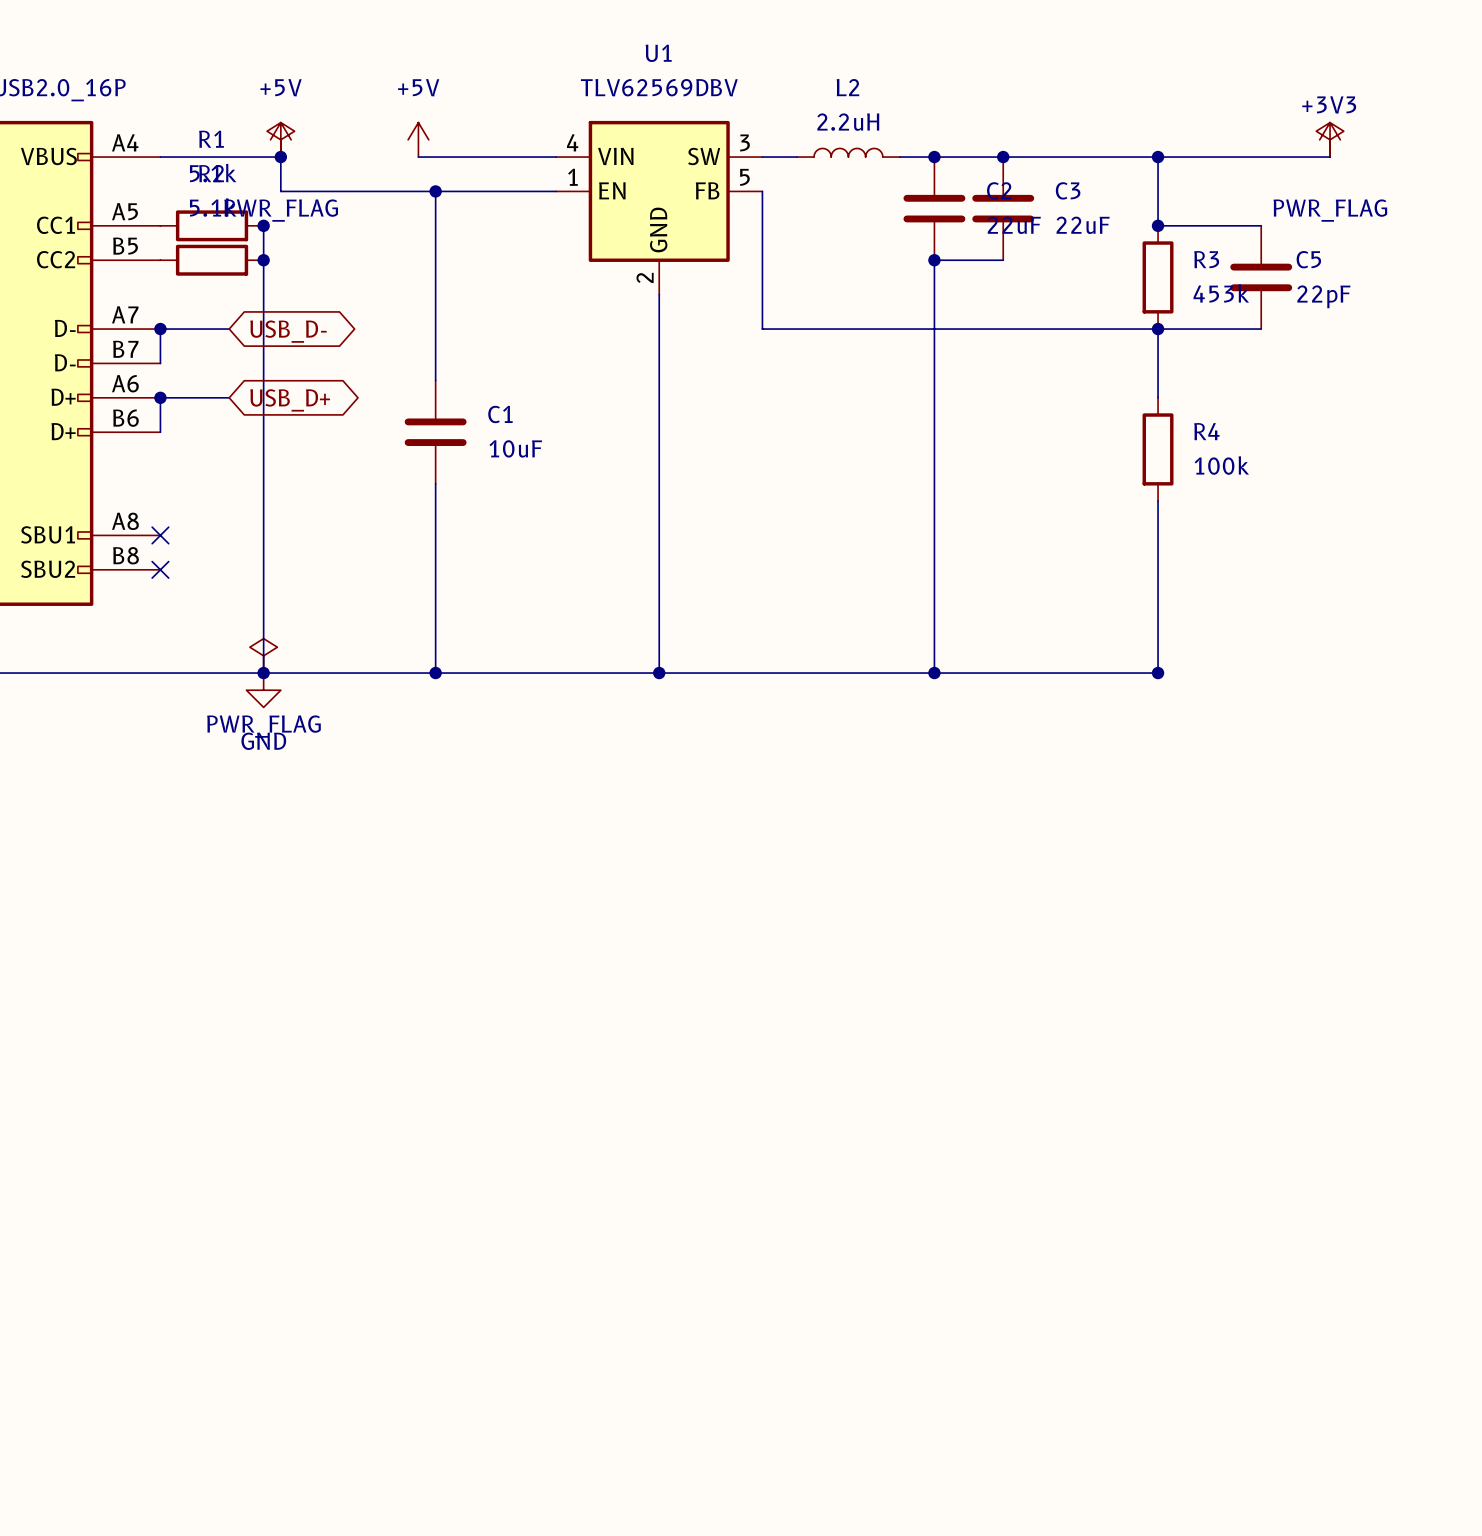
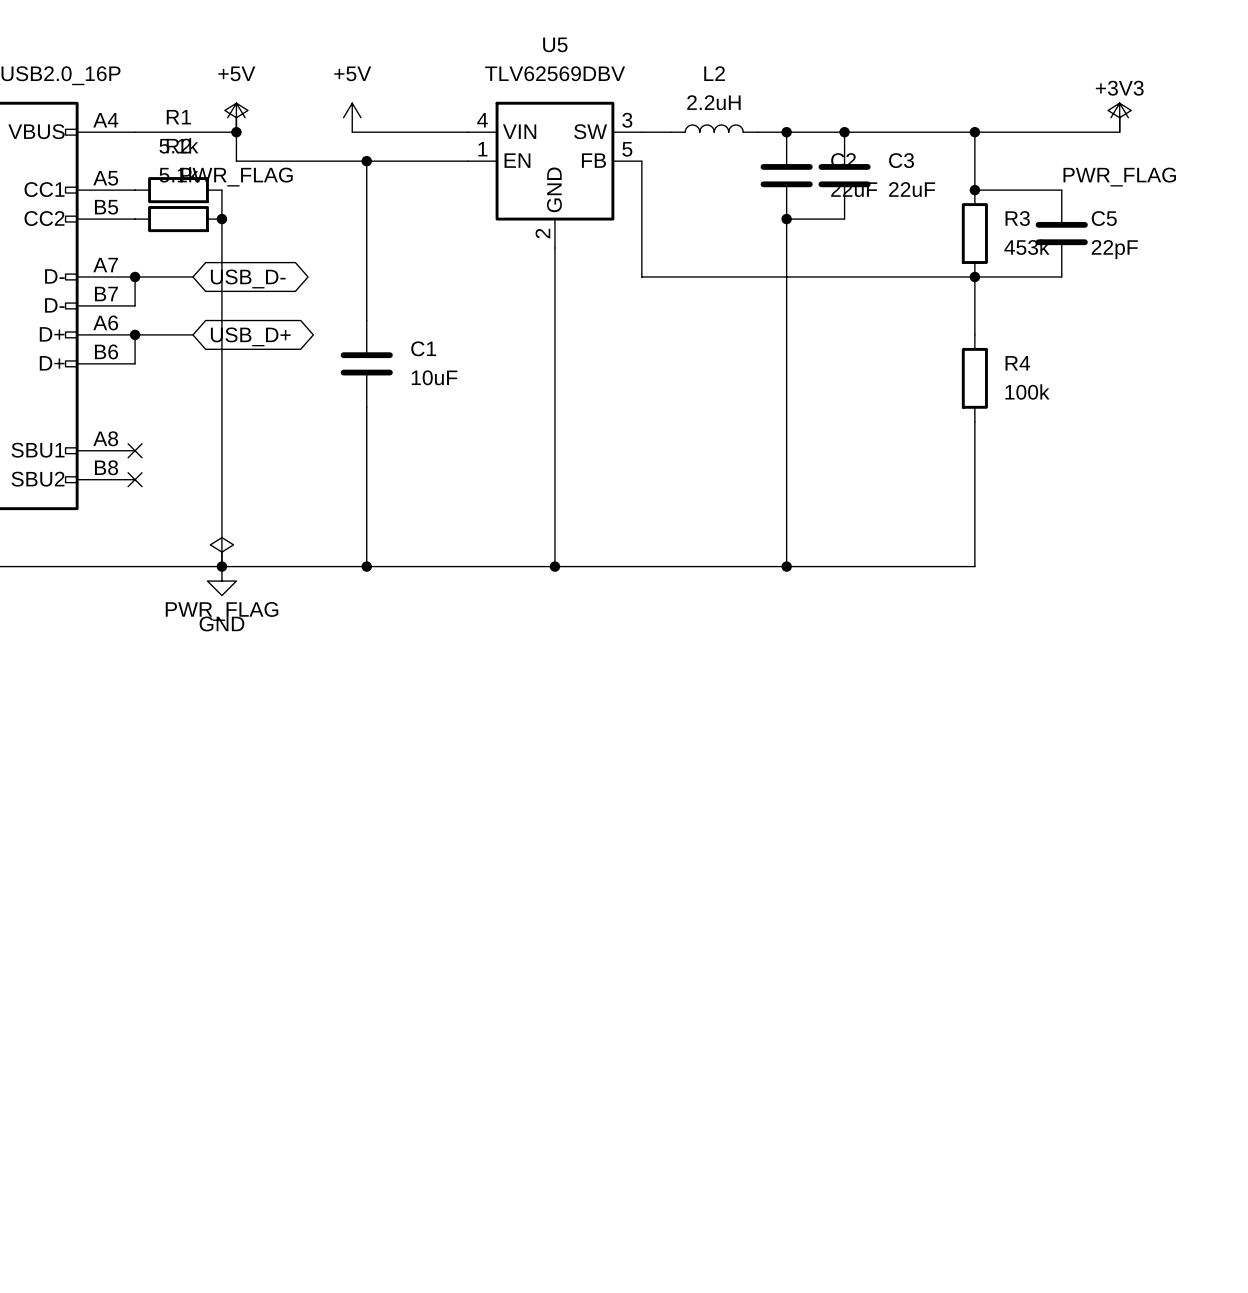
U1 name: U1 (658, 53) -> U5 (555, 44)
junction: (263, 225) -> none
junction: (1158, 673) -> none

